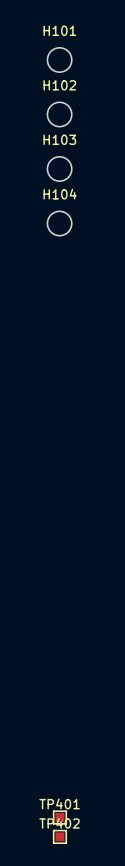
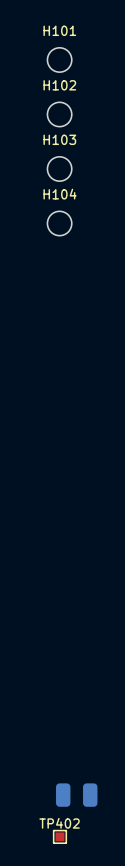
part: none -> (76, 795)
TP401: (59, 817) -> none

